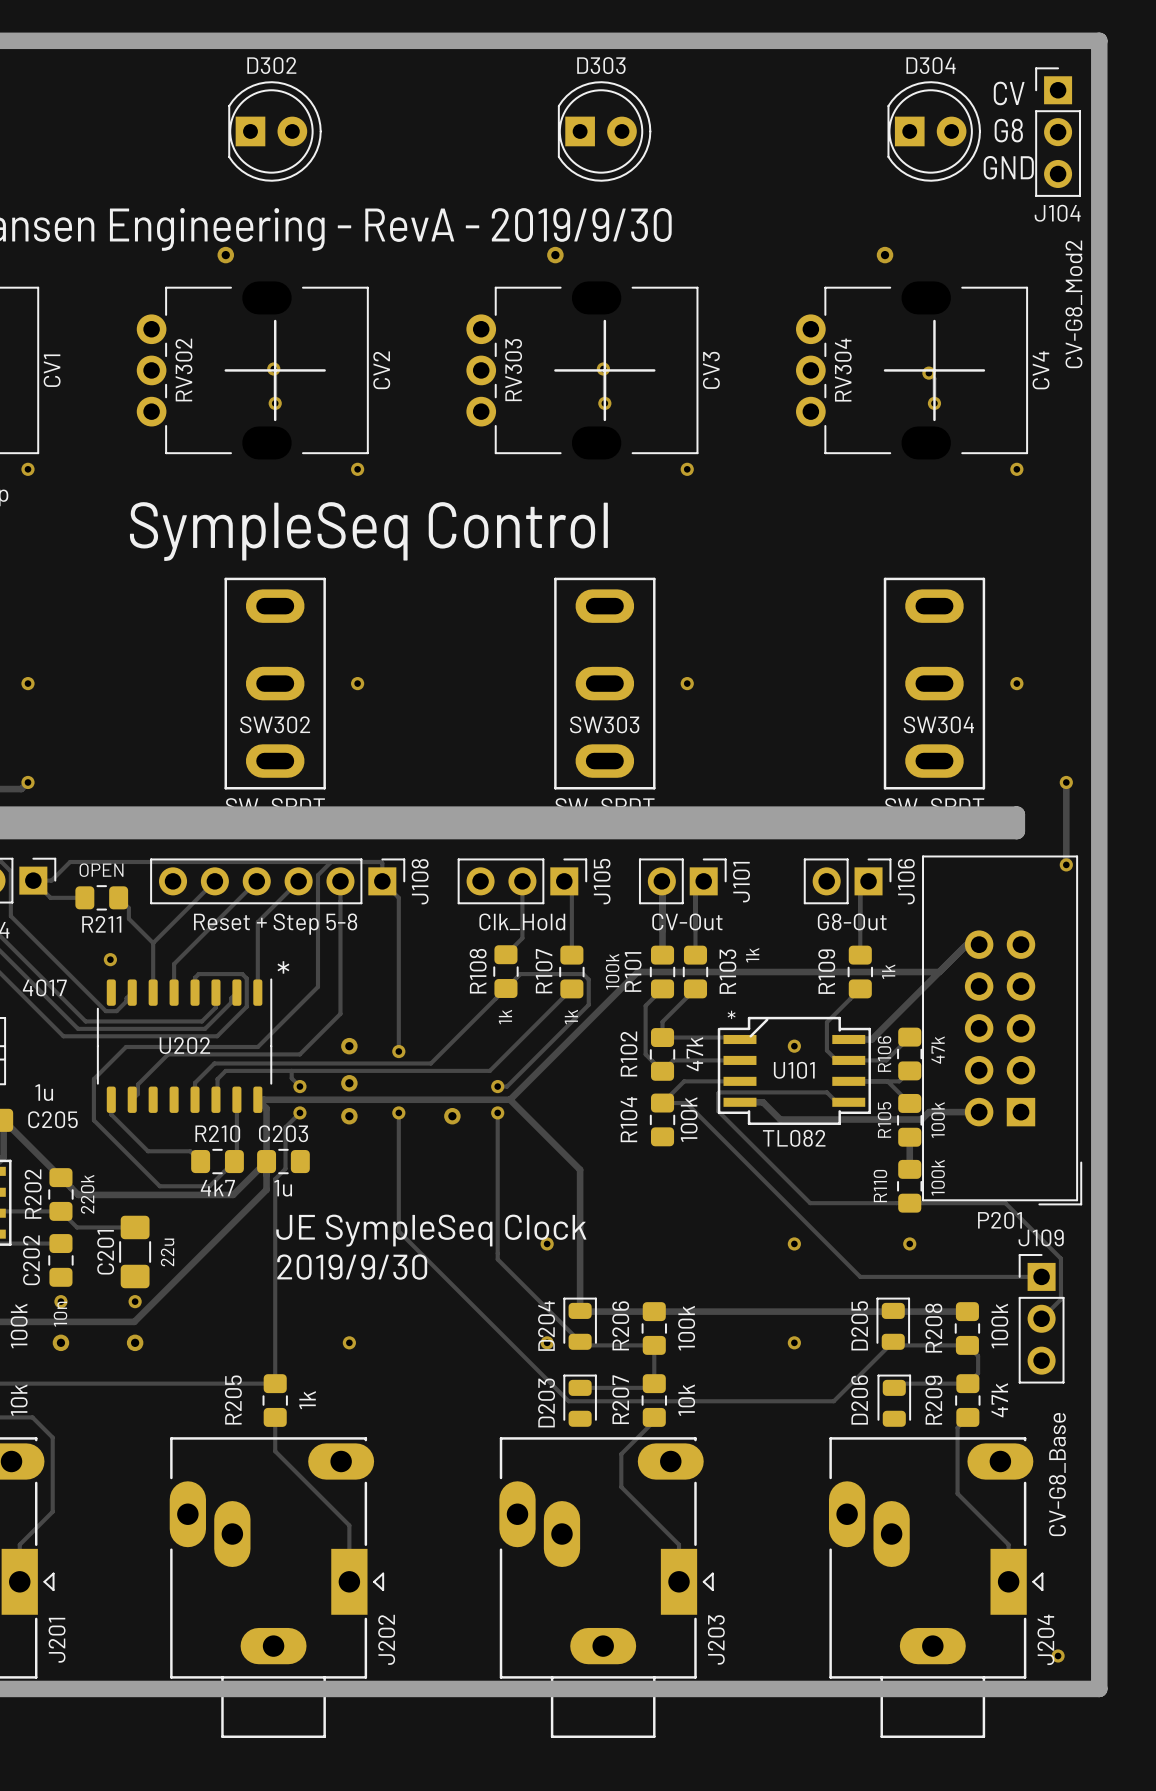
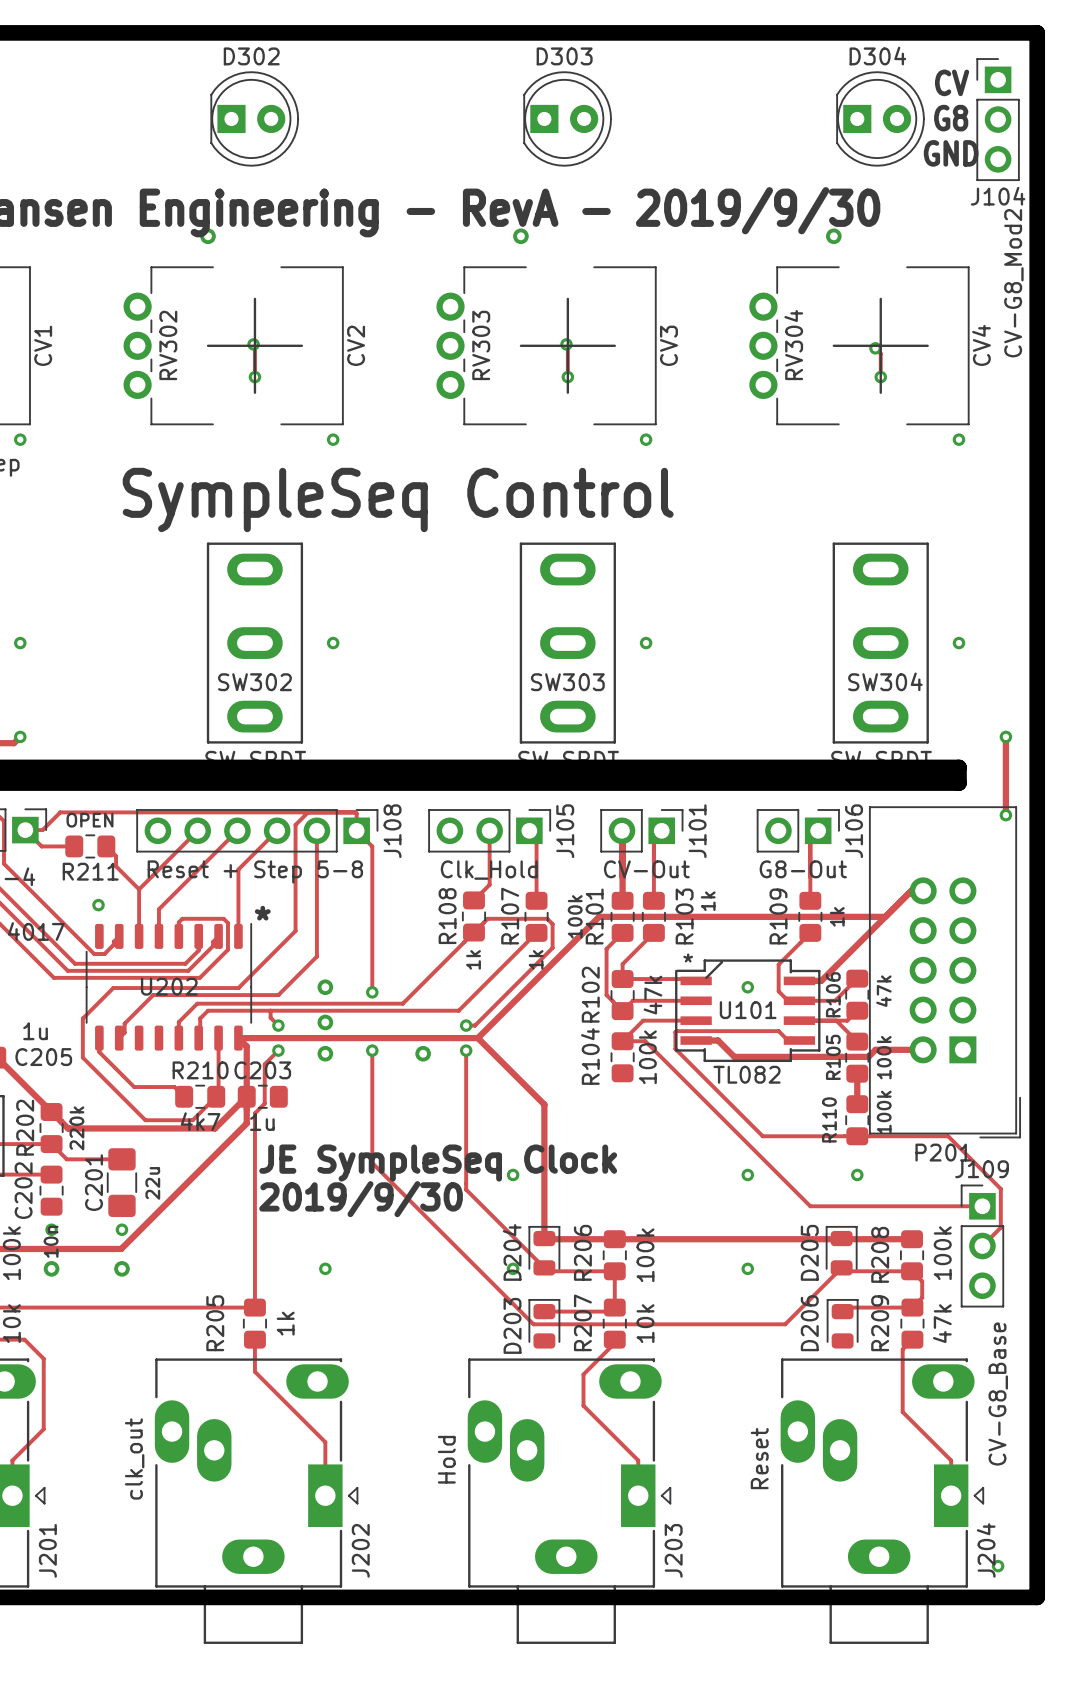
J202 value: none -> clk_out (134, 1458)
J203 value: none -> Hold (446, 1459)
J204 value: none -> Reset (759, 1458)

